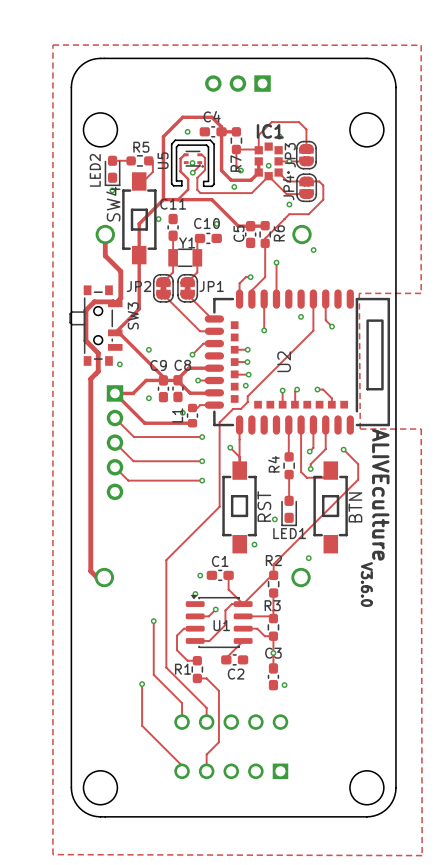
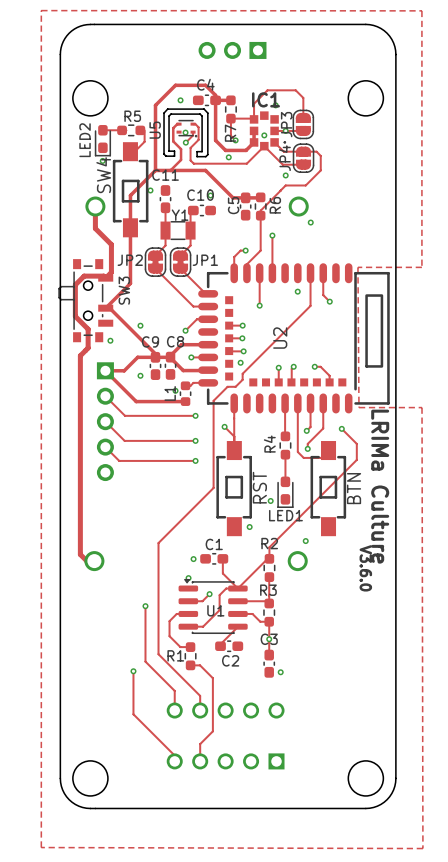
text: ALIVEculture (380, 494) -> LRIMa Culture (380, 486)

